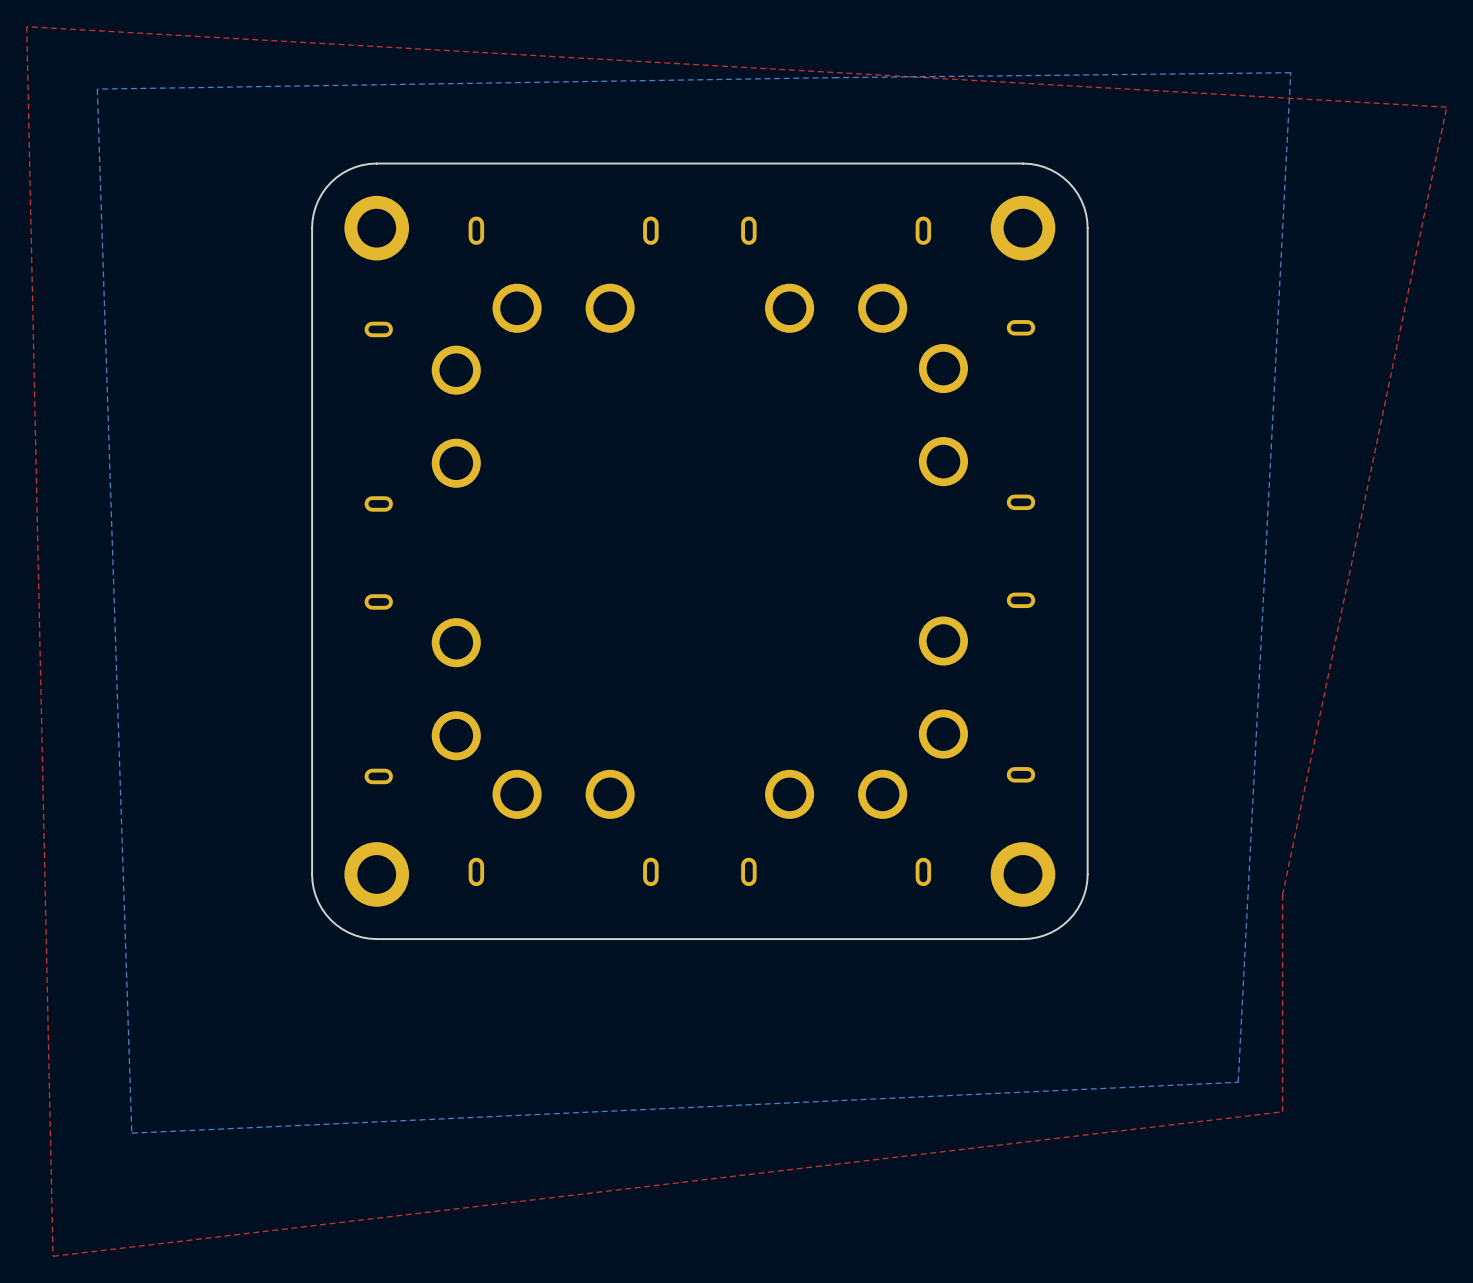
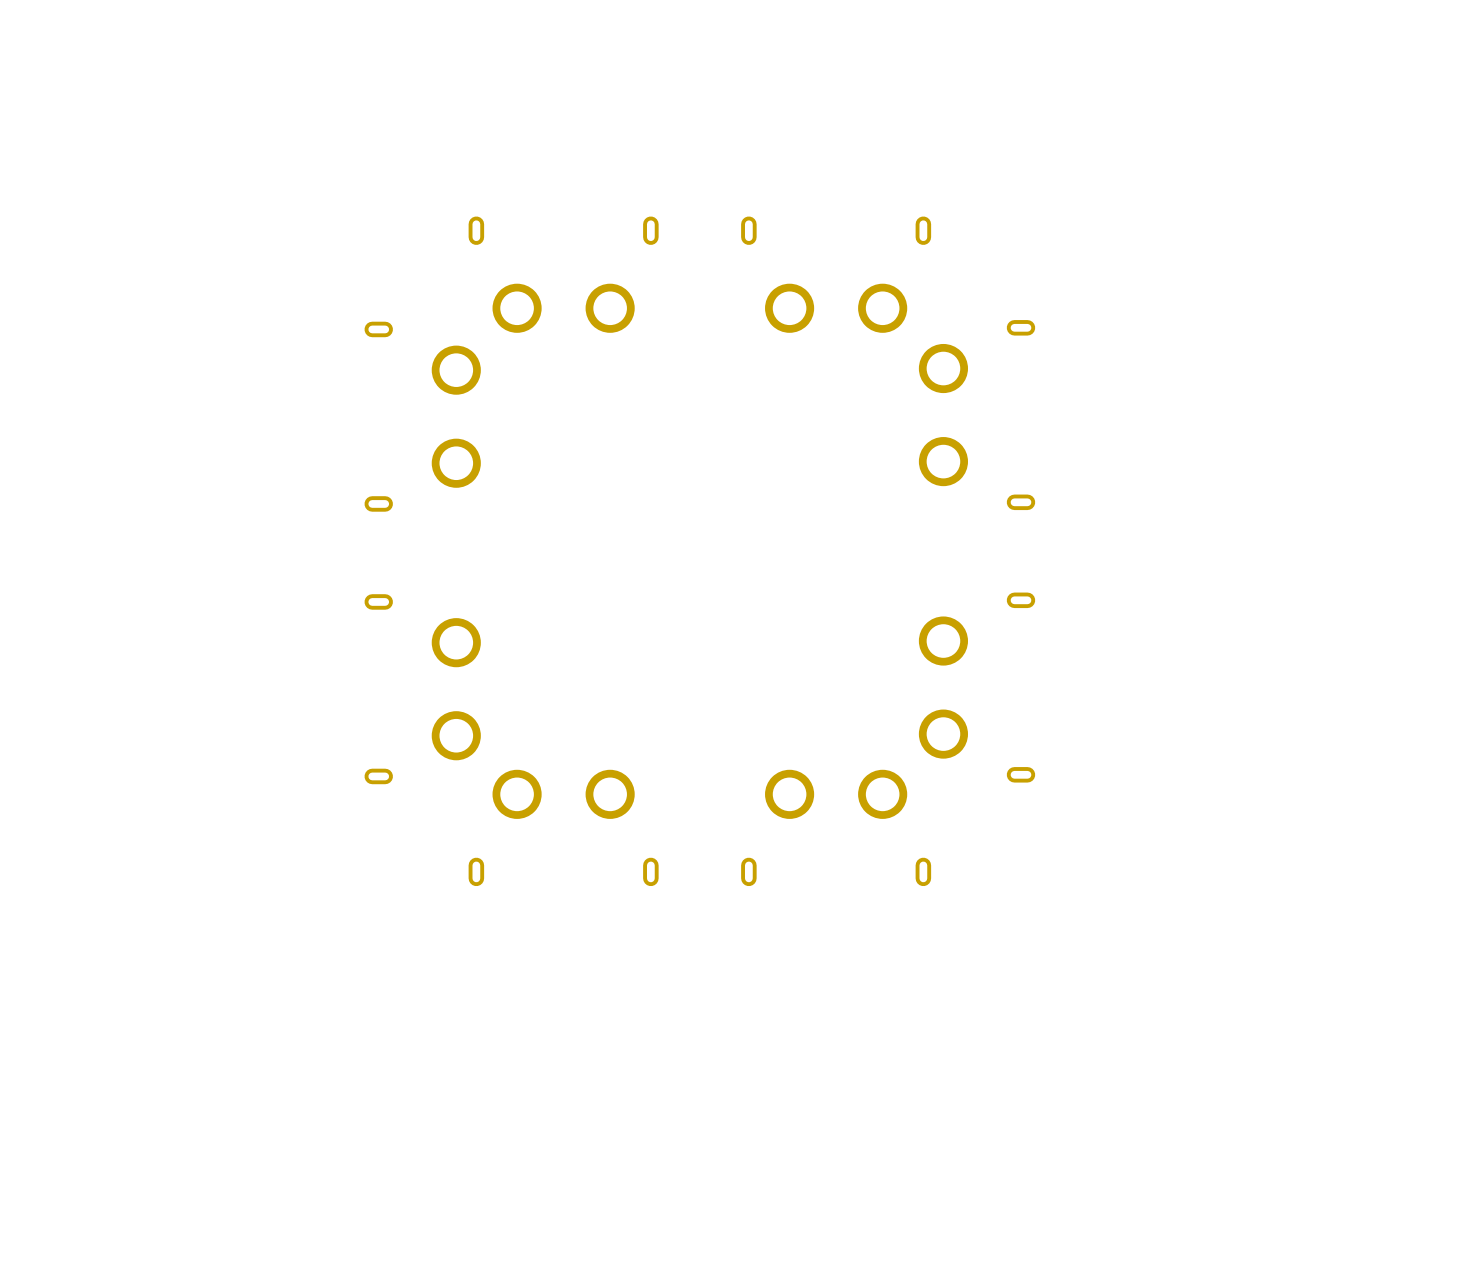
top zone outline: (26, 26) (1446, 107) (1282, 895) (1282, 1111) (53, 1256) (26, 26) -> none
bottom zone outline: (1290, 72) (1238, 1082) (131, 1133) (97, 89) (1290, 72) -> none
board edge: (1023, 163) (376, 163) (355, 167) (342, 173) (331, 182) (322, 193) (315, 206) (312, 228) (312, 874) (315, 895) (322, 908) (331, 920) (342, 929) (355, 935) (376, 939) (1023, 939) (1037, 937) (1051, 932) (1068, 920) (1077, 908) (1084, 895) (1087, 874) (1087, 220) (1081, 200) (1068, 182) (1057, 173) (1044, 167) (1023, 163) -> none
part: (376, 228) -> none
part: (1023, 228) -> none
part: (376, 874) -> none
part: (1023, 874) -> none

